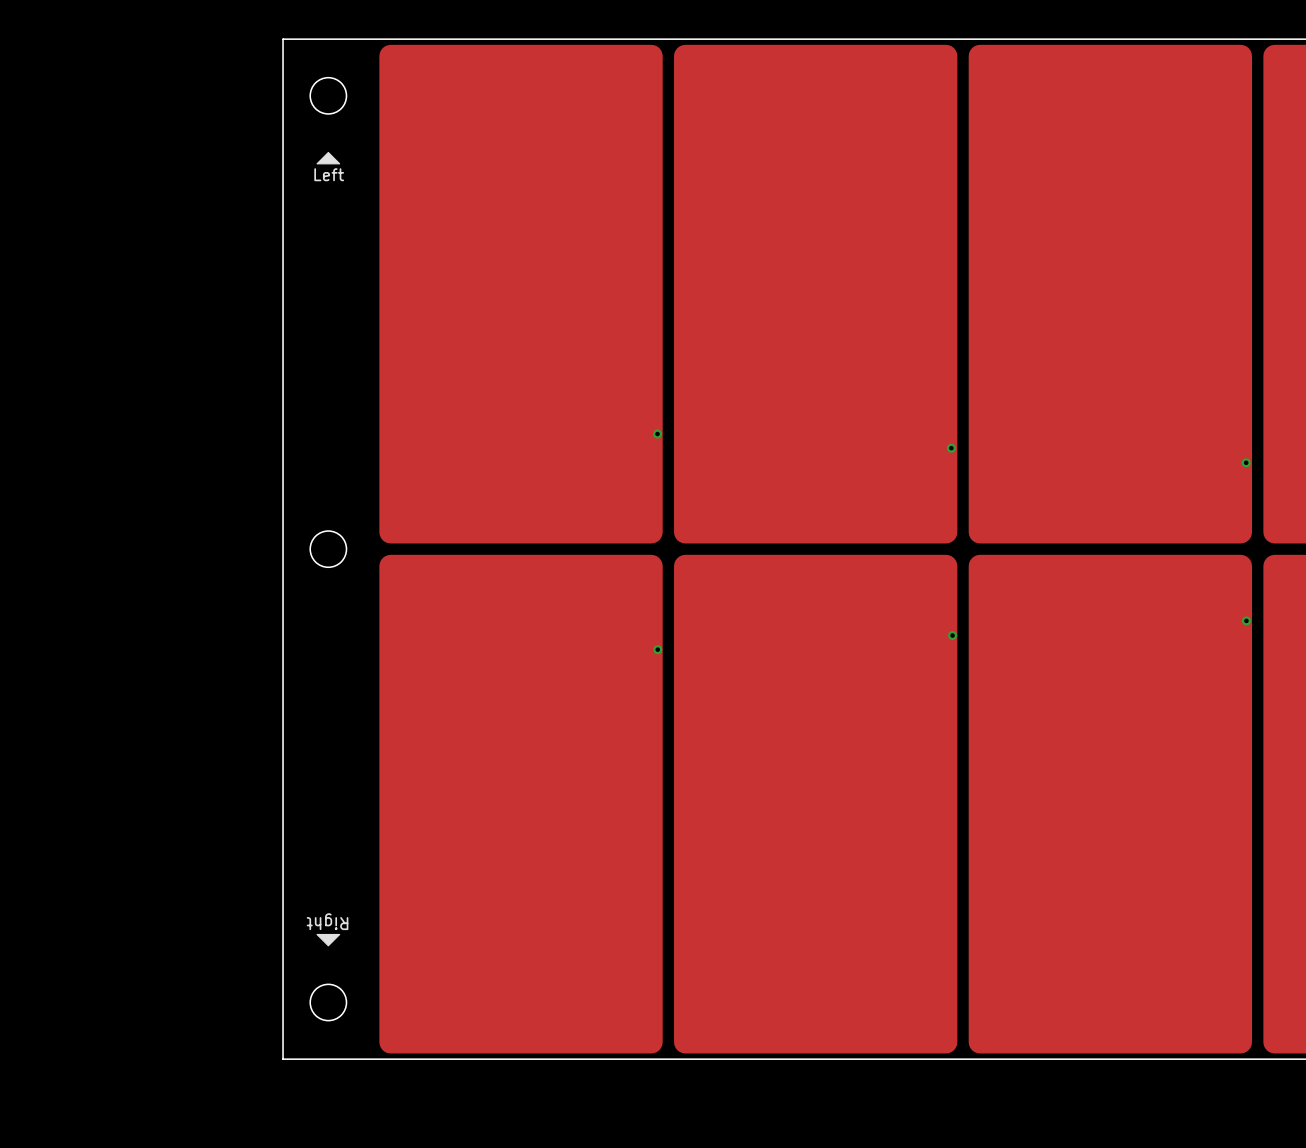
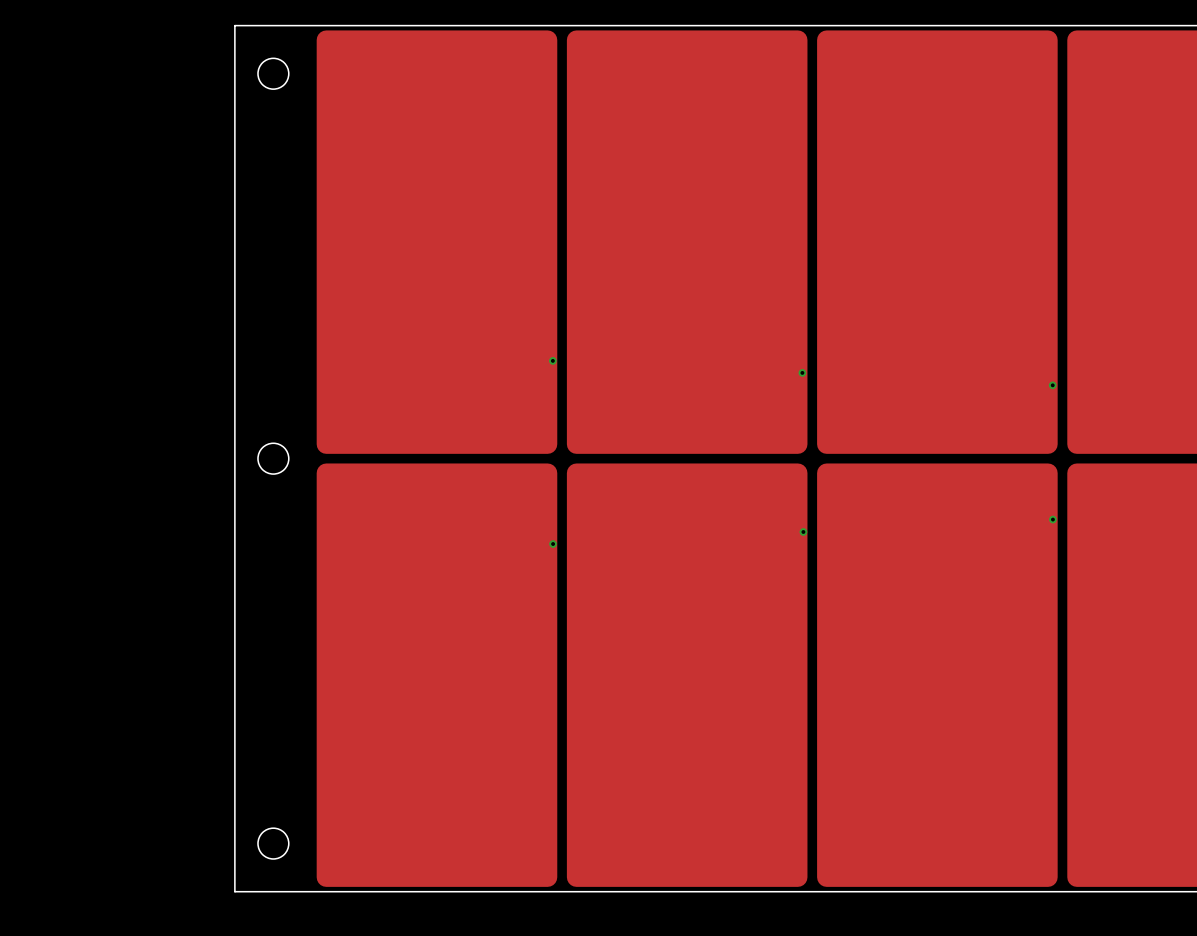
drawing: [316, 151, 341, 165] -> none
text: Left (329, 174) -> none
text: Right (327, 921) -> none
drawing: [316, 933, 341, 947] -> none

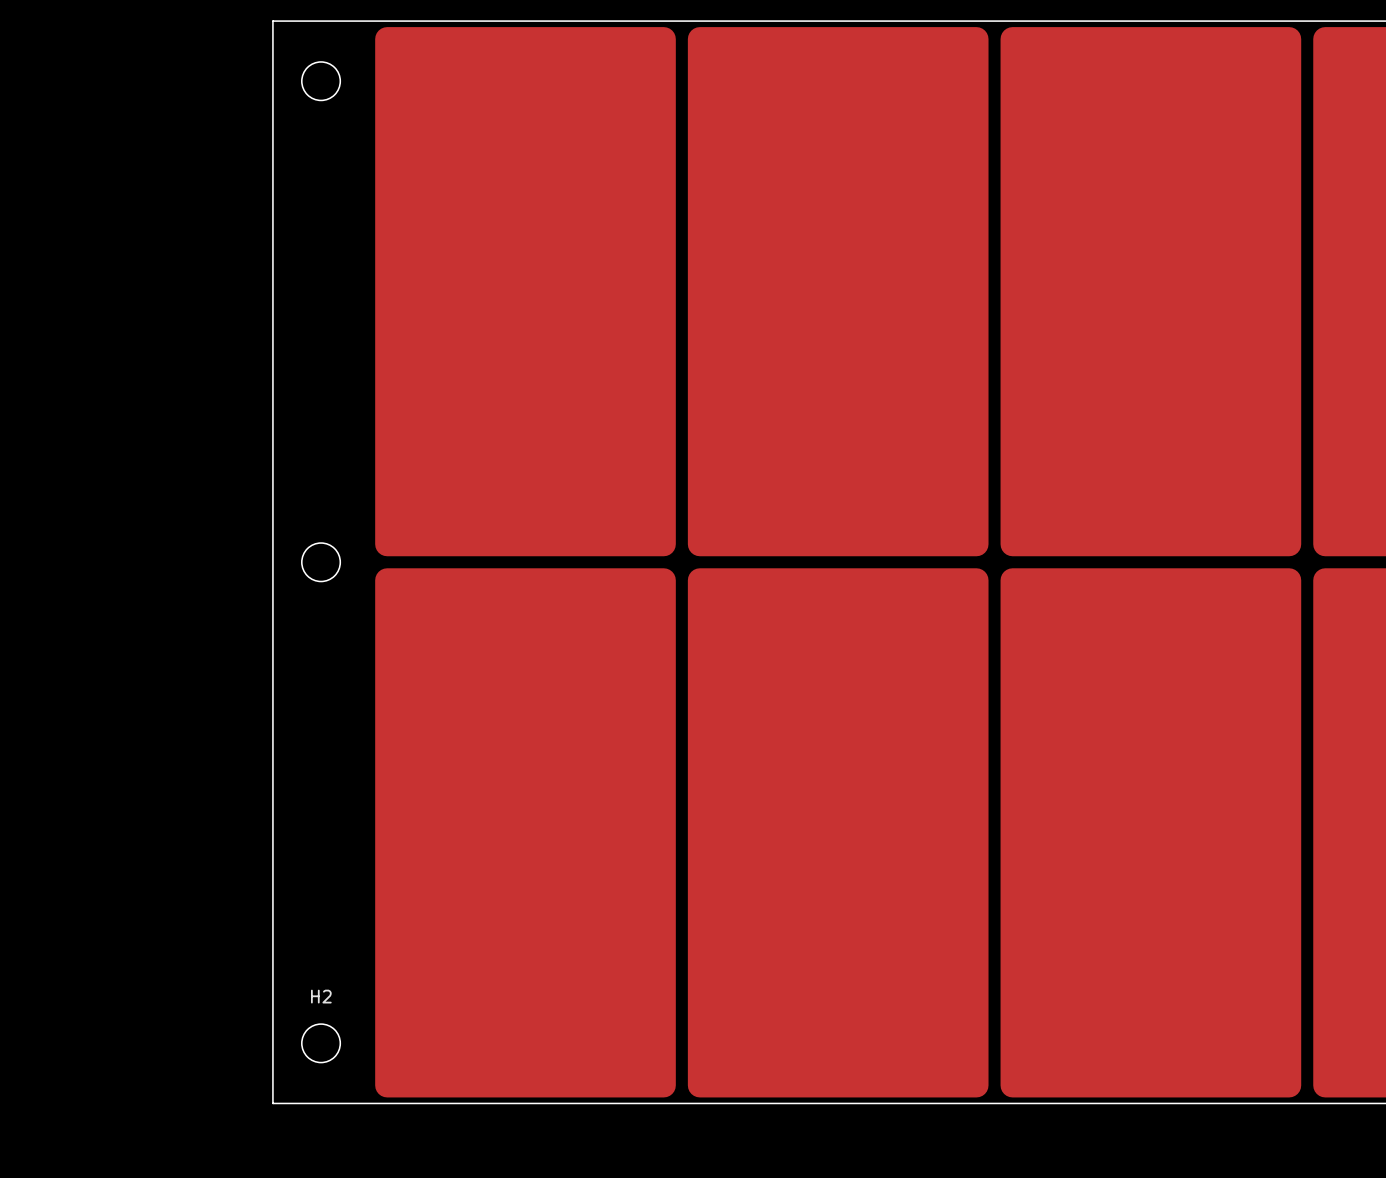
via: (552, 360) -> none
via: (802, 372) -> none
via: (1052, 385) -> none
via: (1052, 519) -> none
via: (803, 531) -> none
via: (553, 544) -> none
H2 name: none -> H2 (321, 996)

